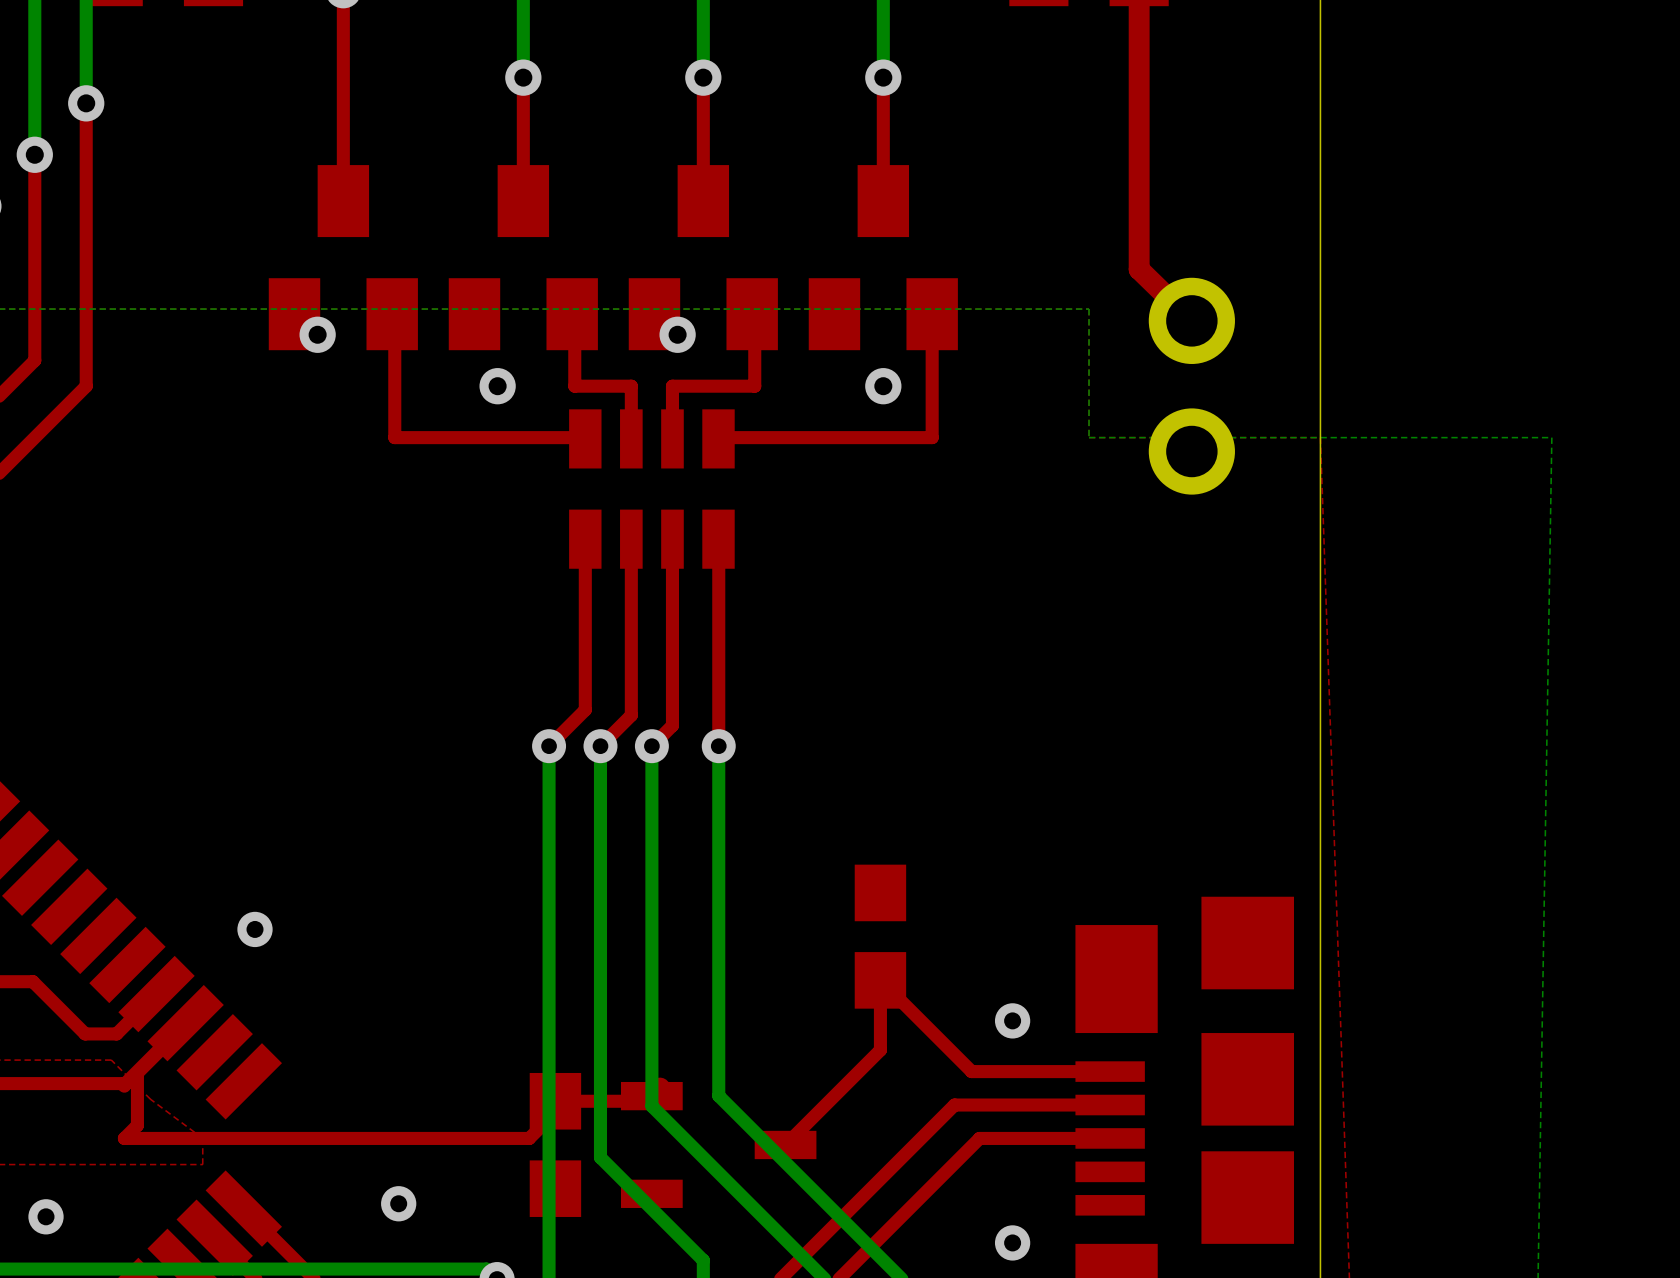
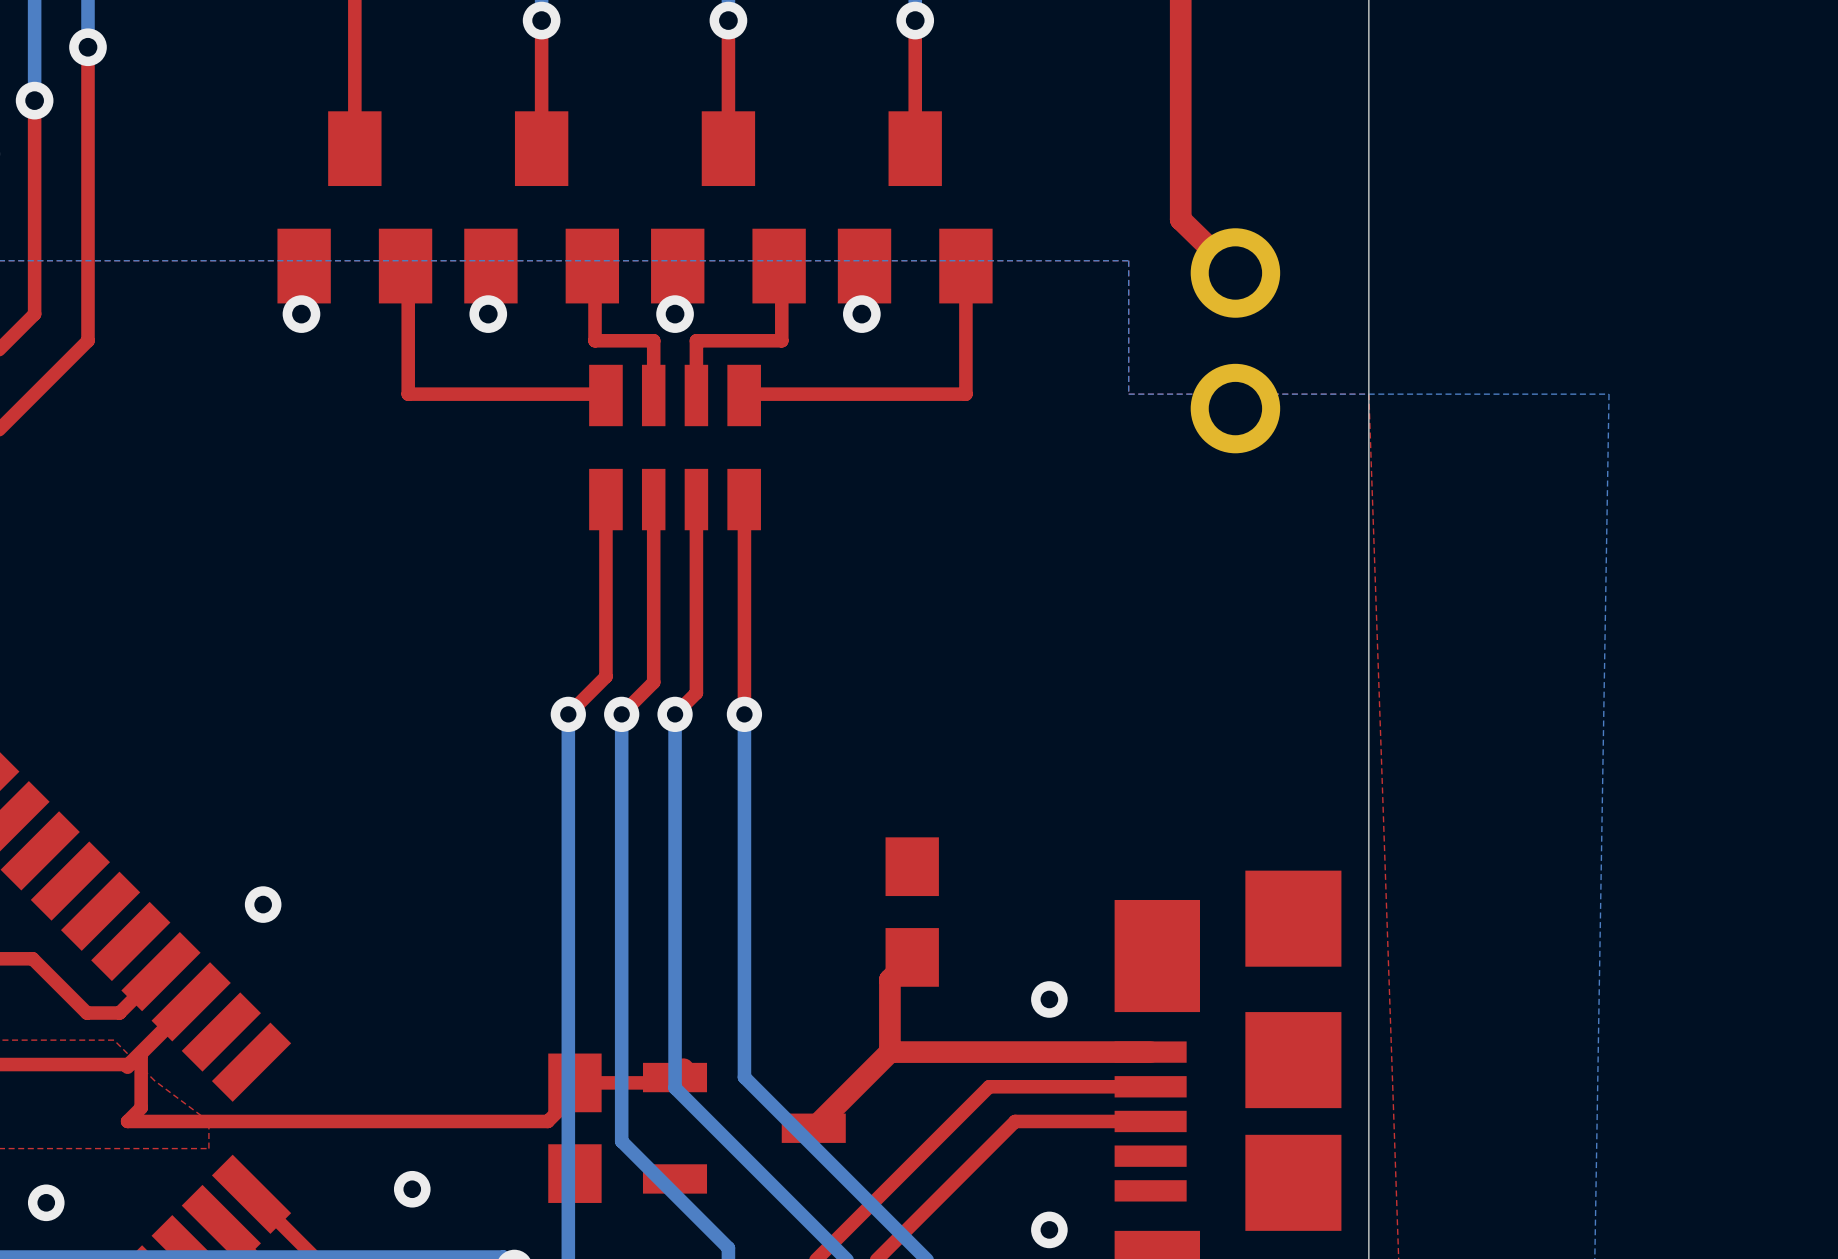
via position: (317, 334) -> (301, 314)
via position: (677, 334) -> (675, 314)
via position: (497, 386) -> (488, 314)
via position: (883, 386) -> (861, 314)
top track: none -> (912, 957) (889, 979) (889, 1052) (1150, 1052)
top track width: thin (858, 1071) (785, 1144) -> thick (889, 1052) (813, 1128)
top track: (971, 1071) (880, 980) (880, 1050) (858, 1071) -> none

